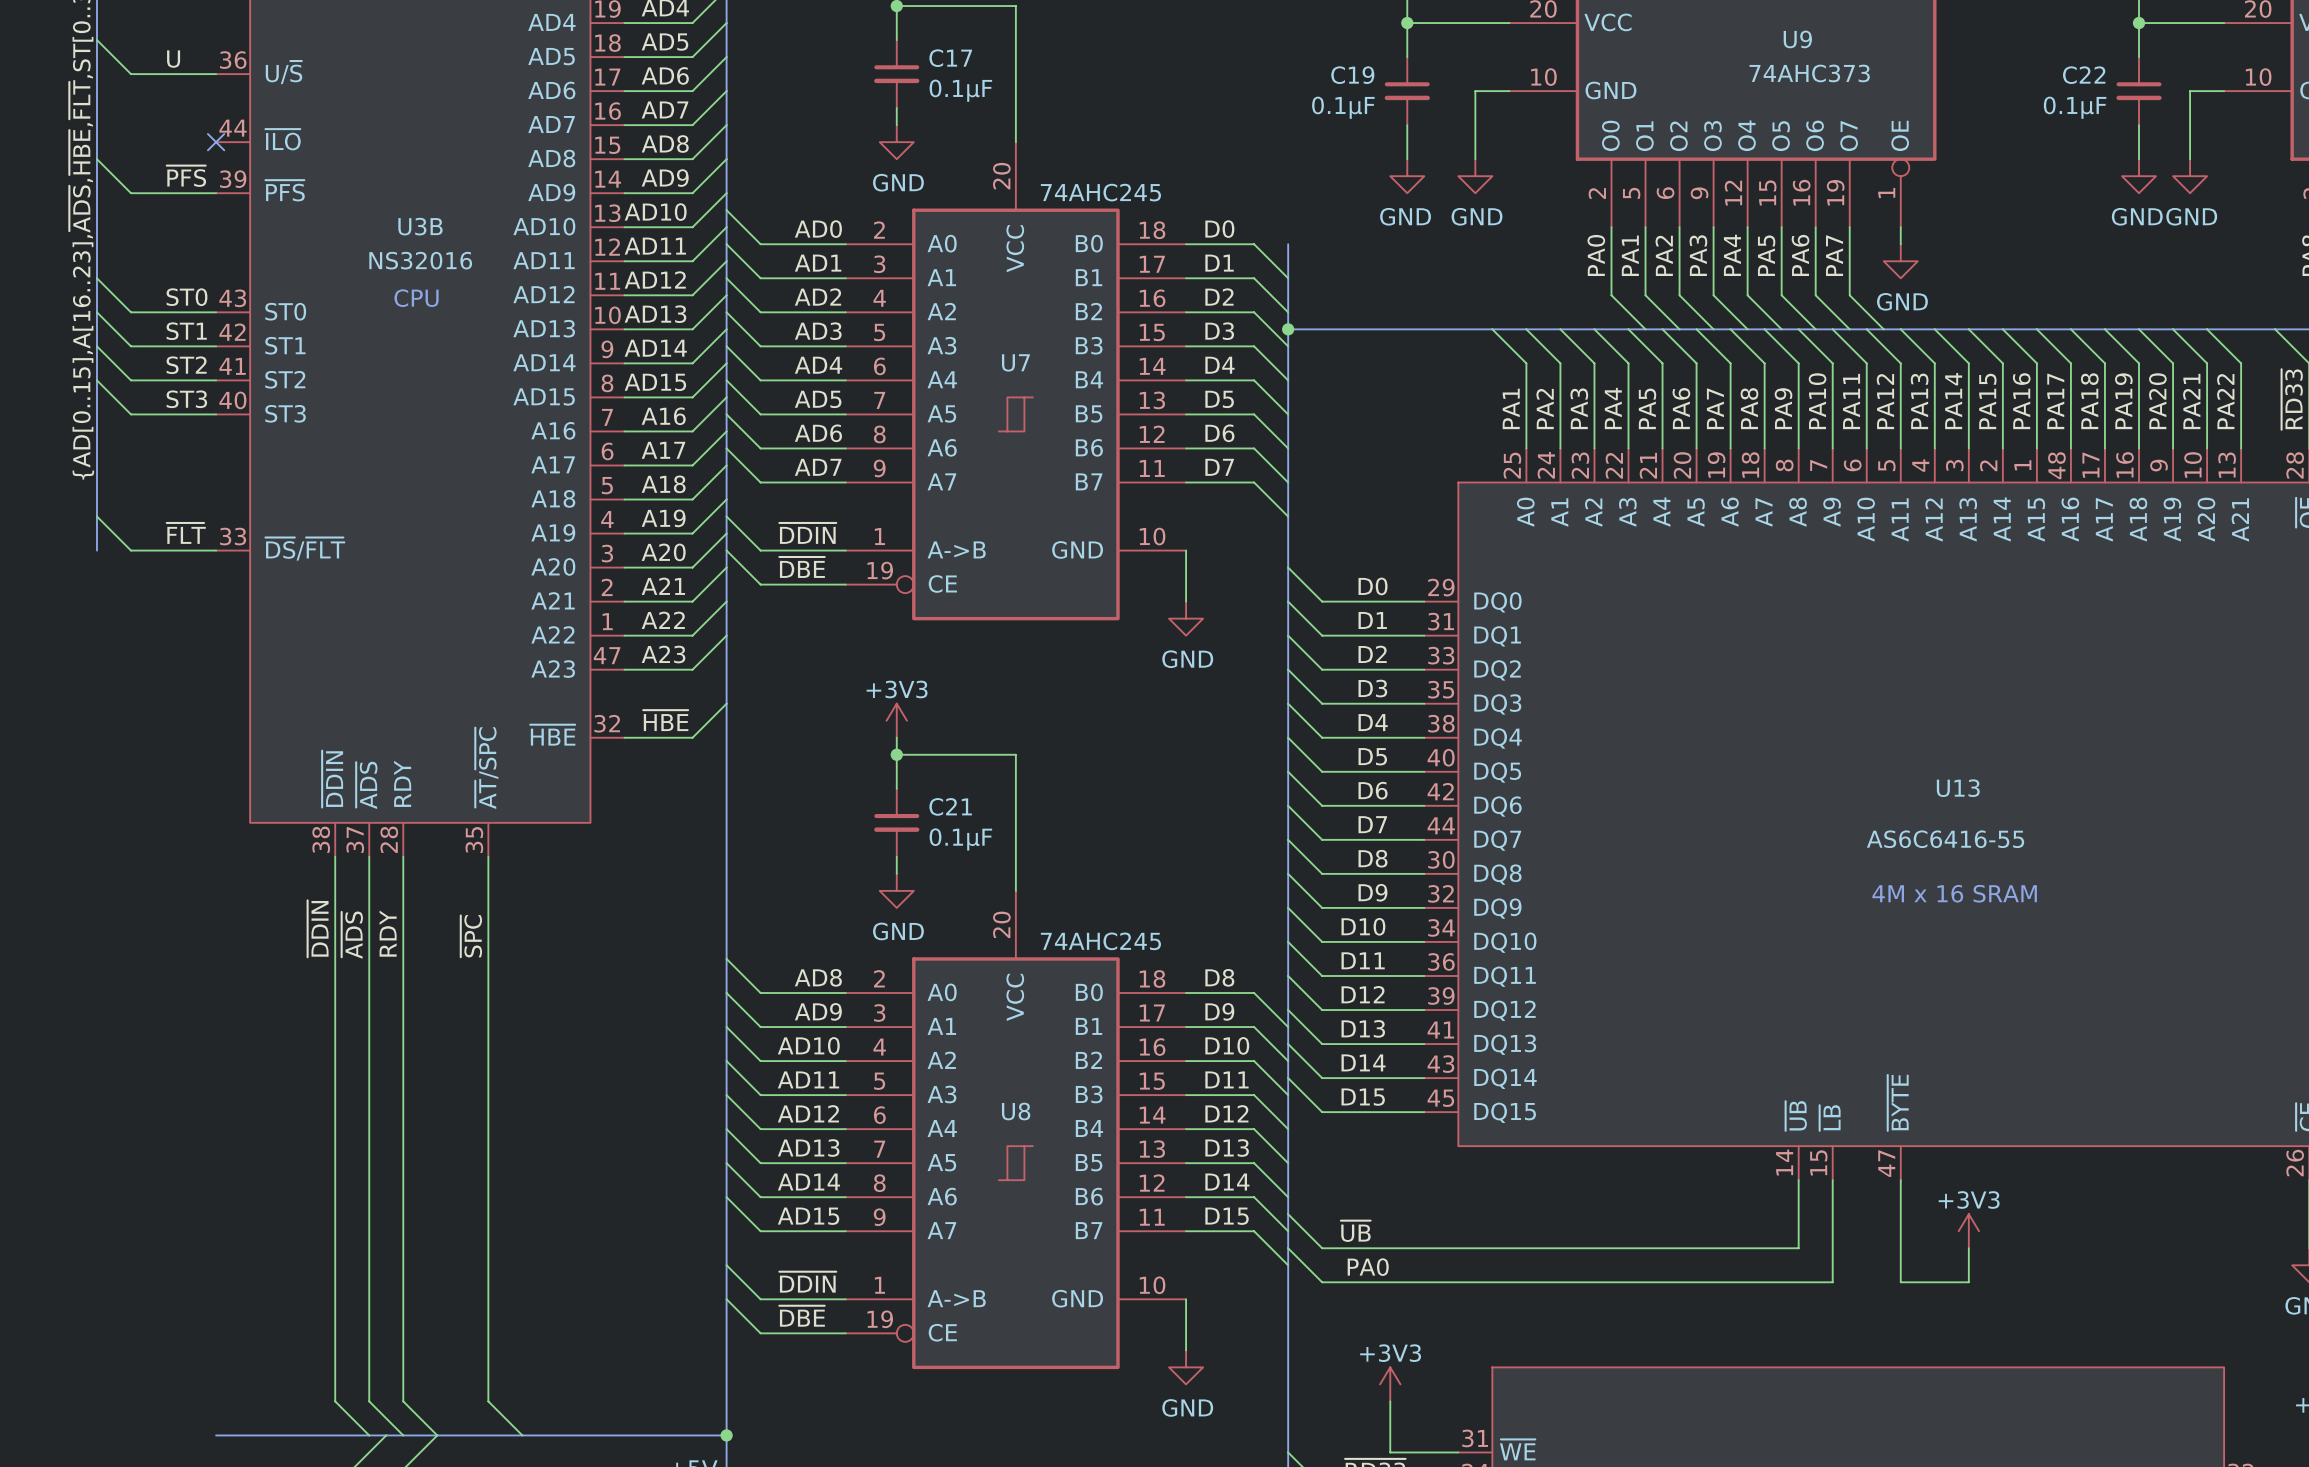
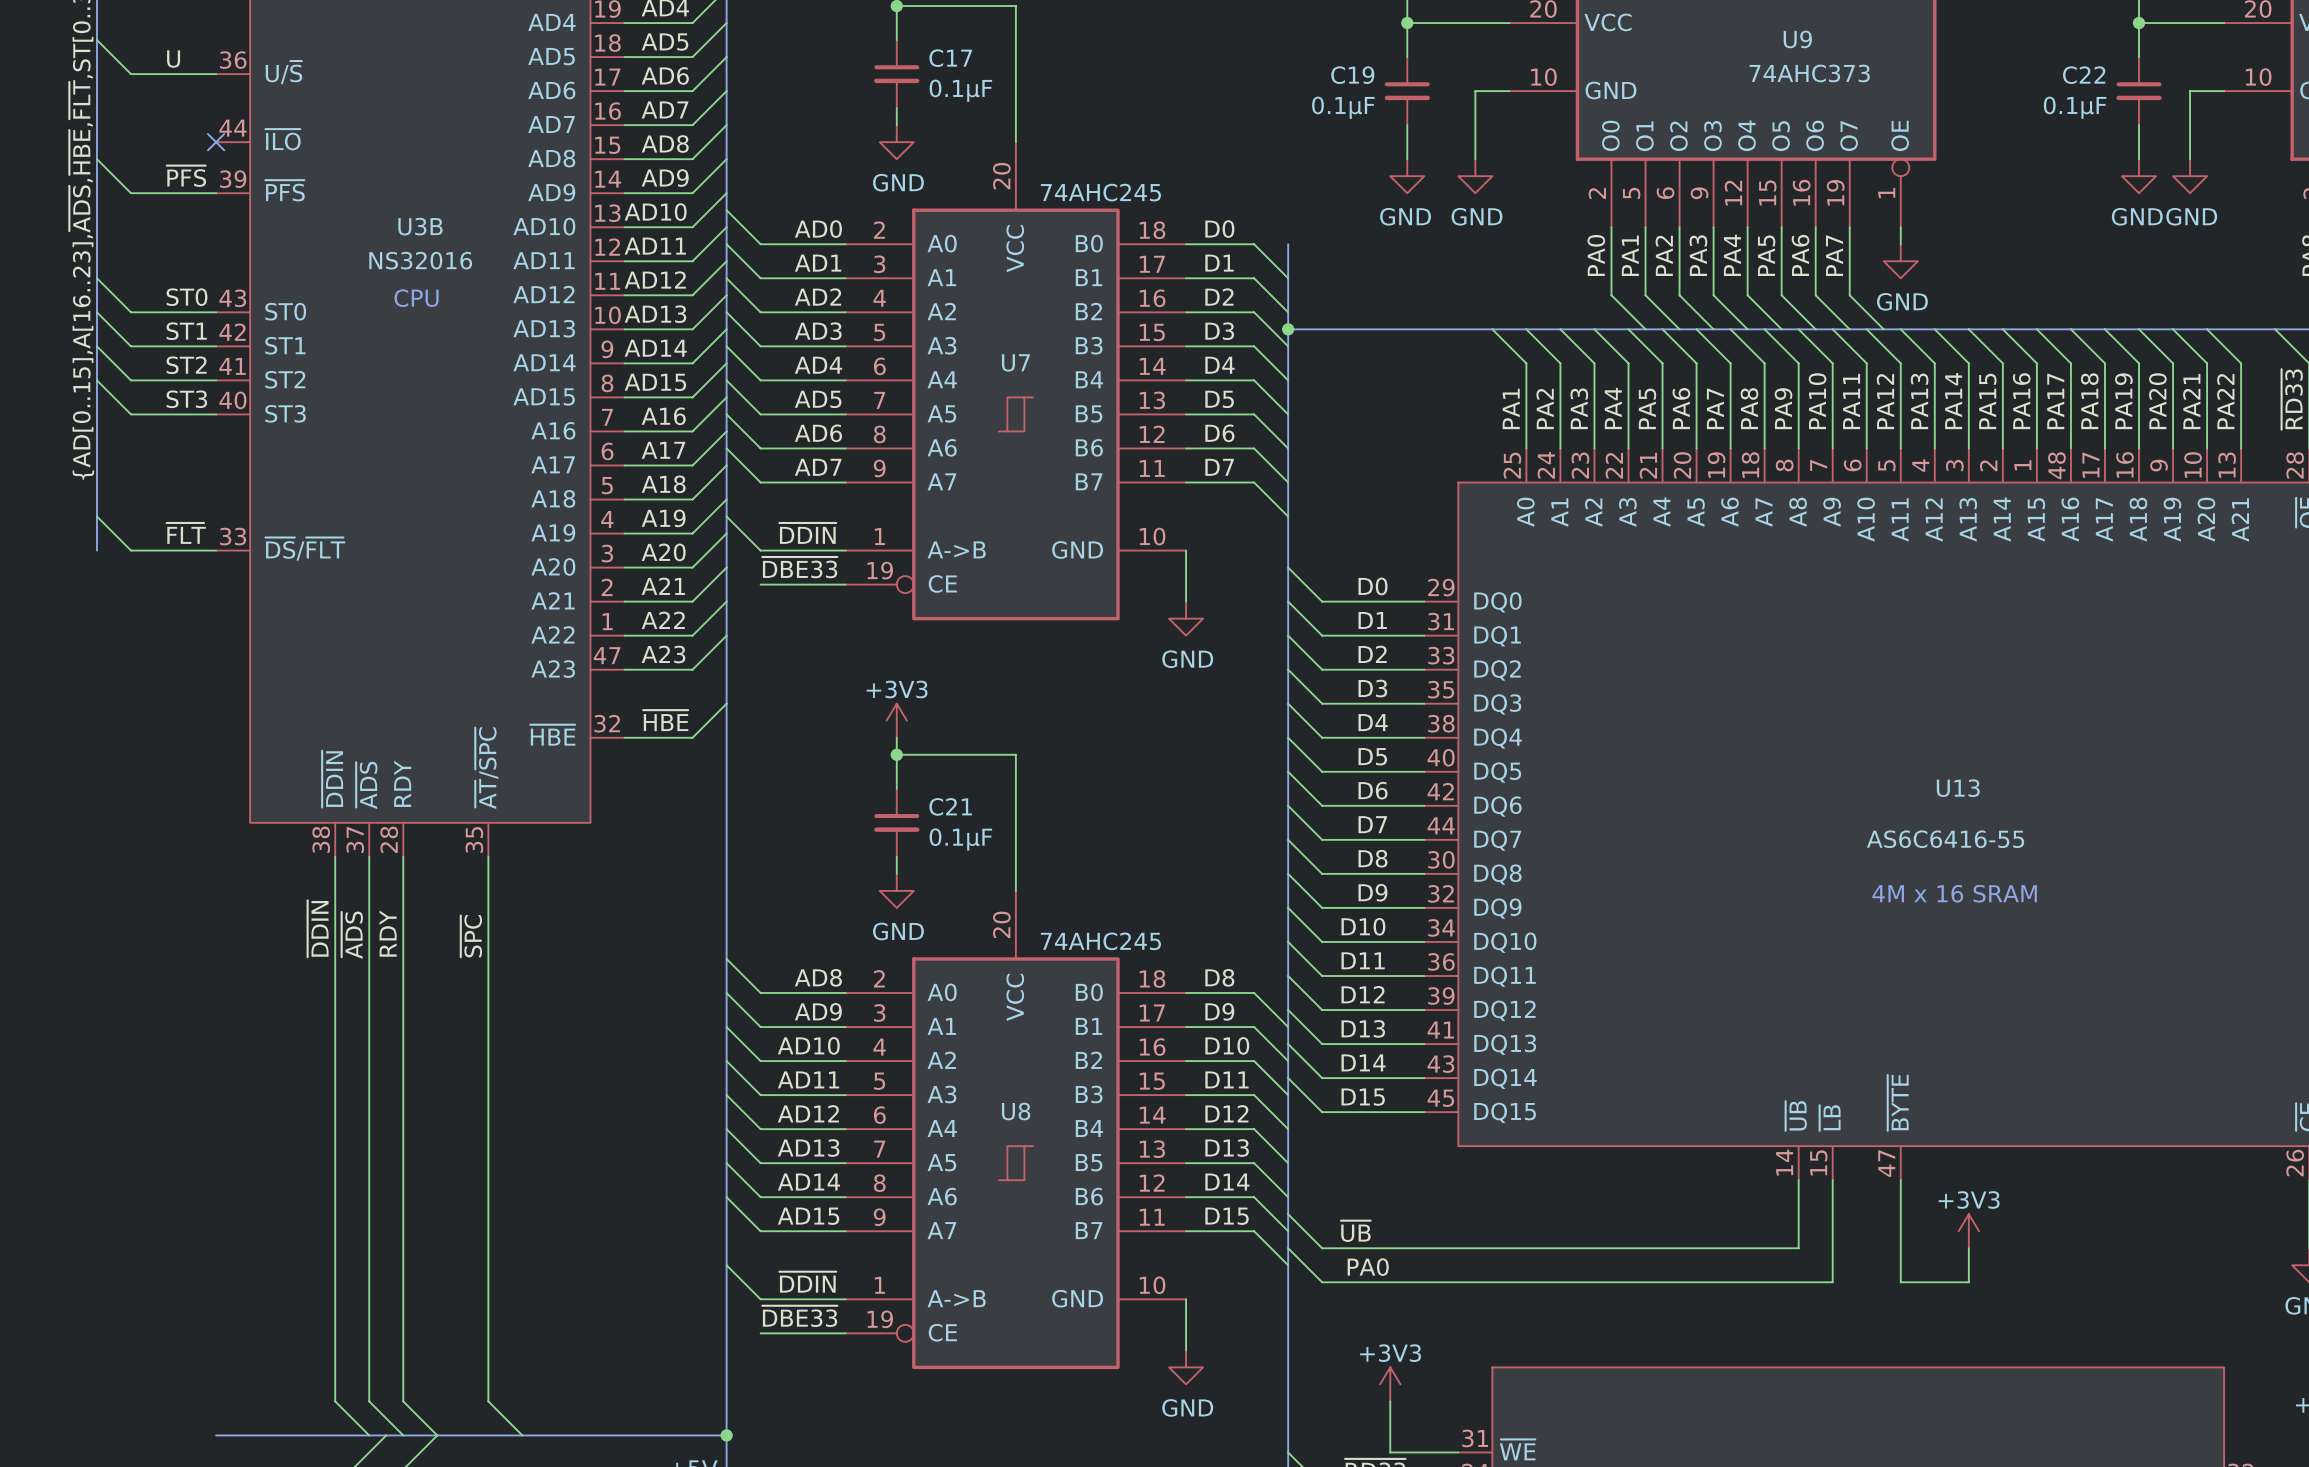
wire: (726, 550) (760, 584) -> none
label: ~{DBE} (802, 567) -> ~{DBE33} (799, 567)
wire: (726, 1299) (760, 1333) -> none
label: ~{DBE} (802, 1316) -> ~{DBE33} (799, 1316)

